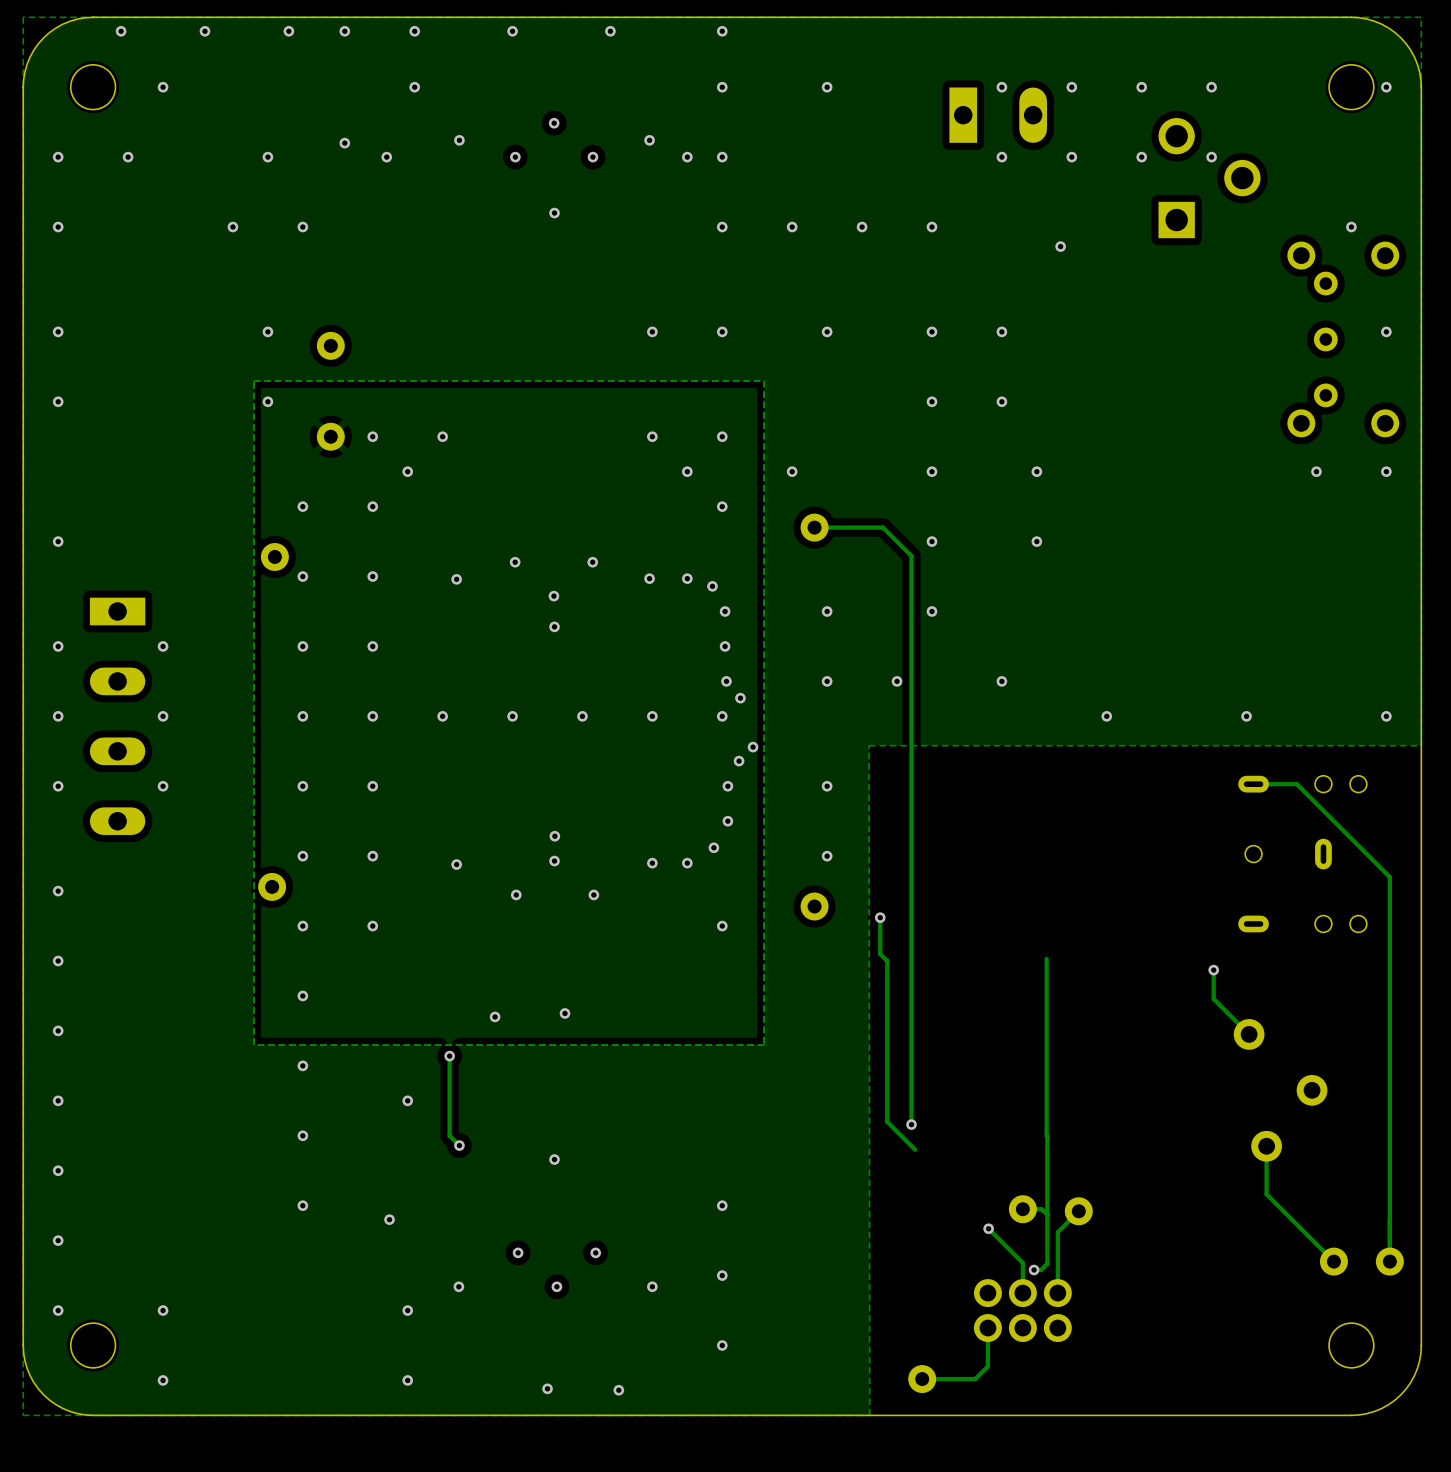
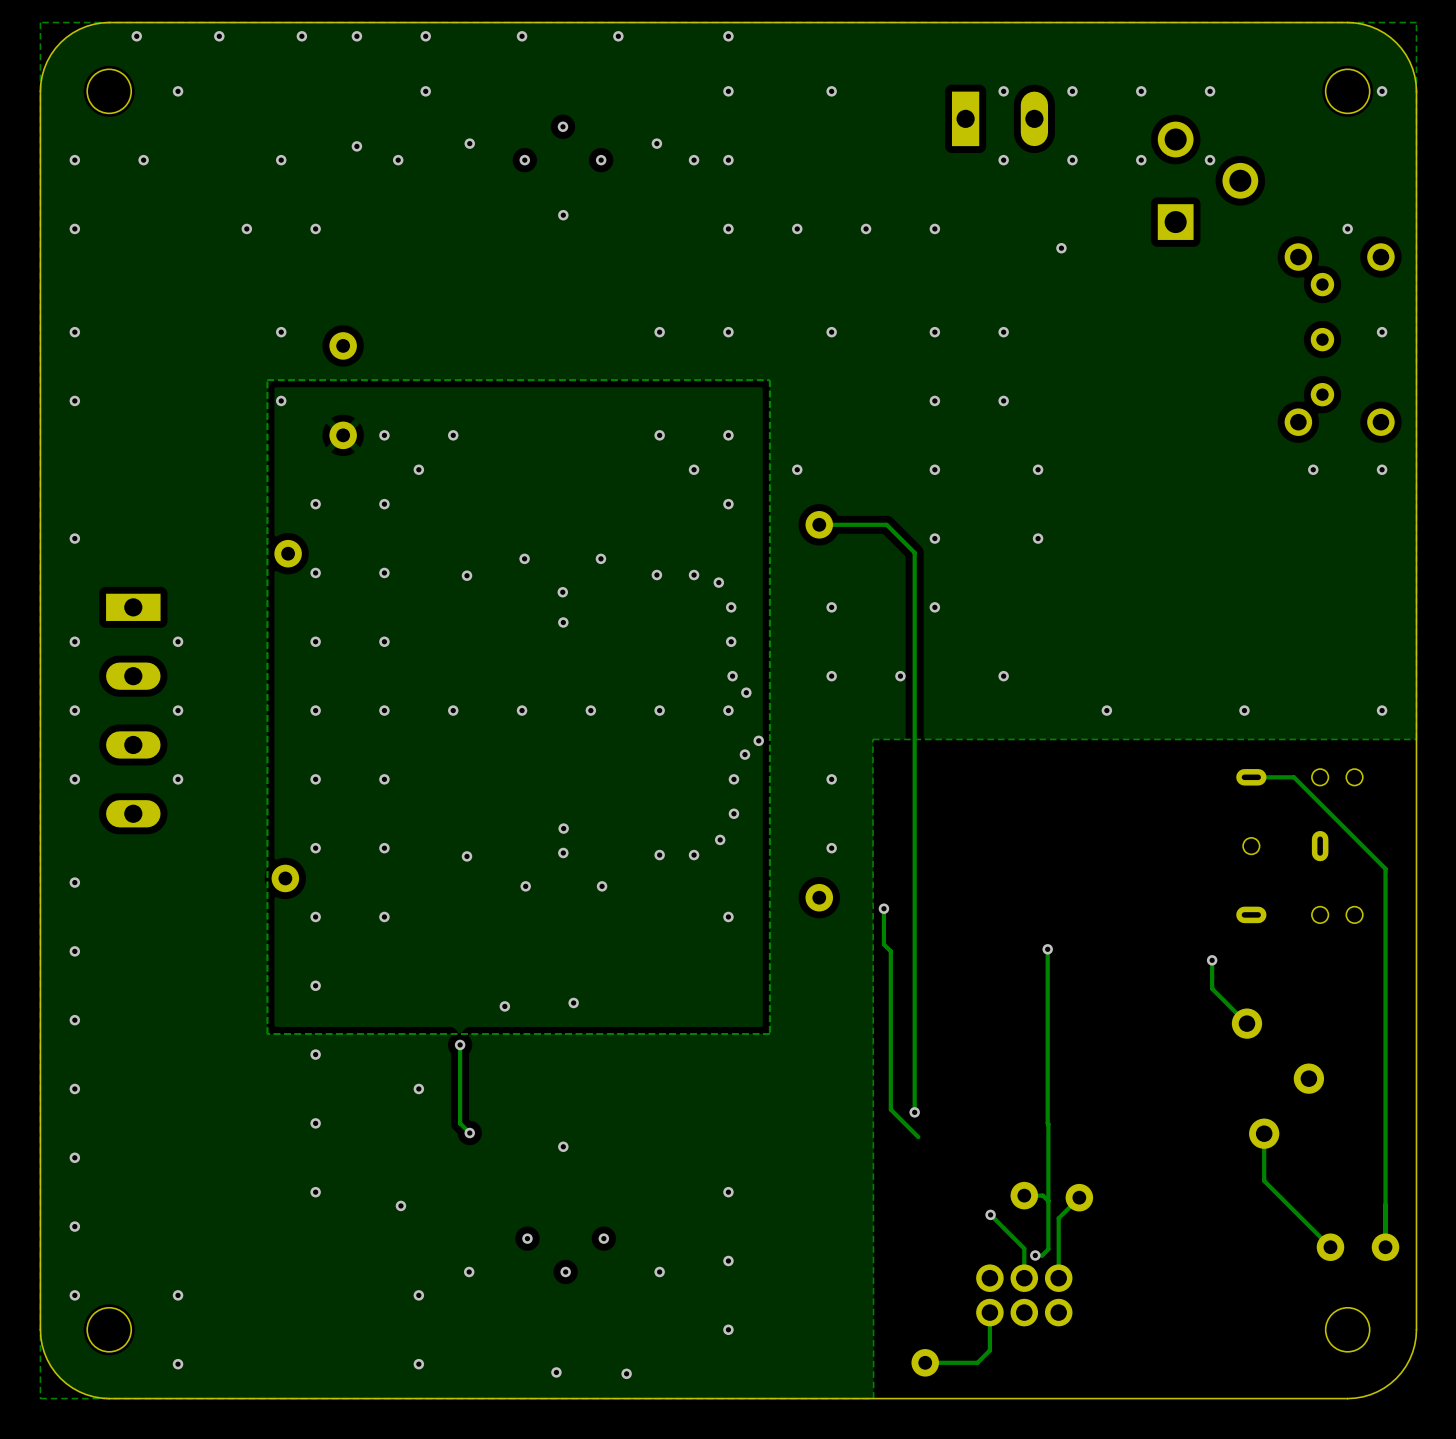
via: none -> (1047, 949)

